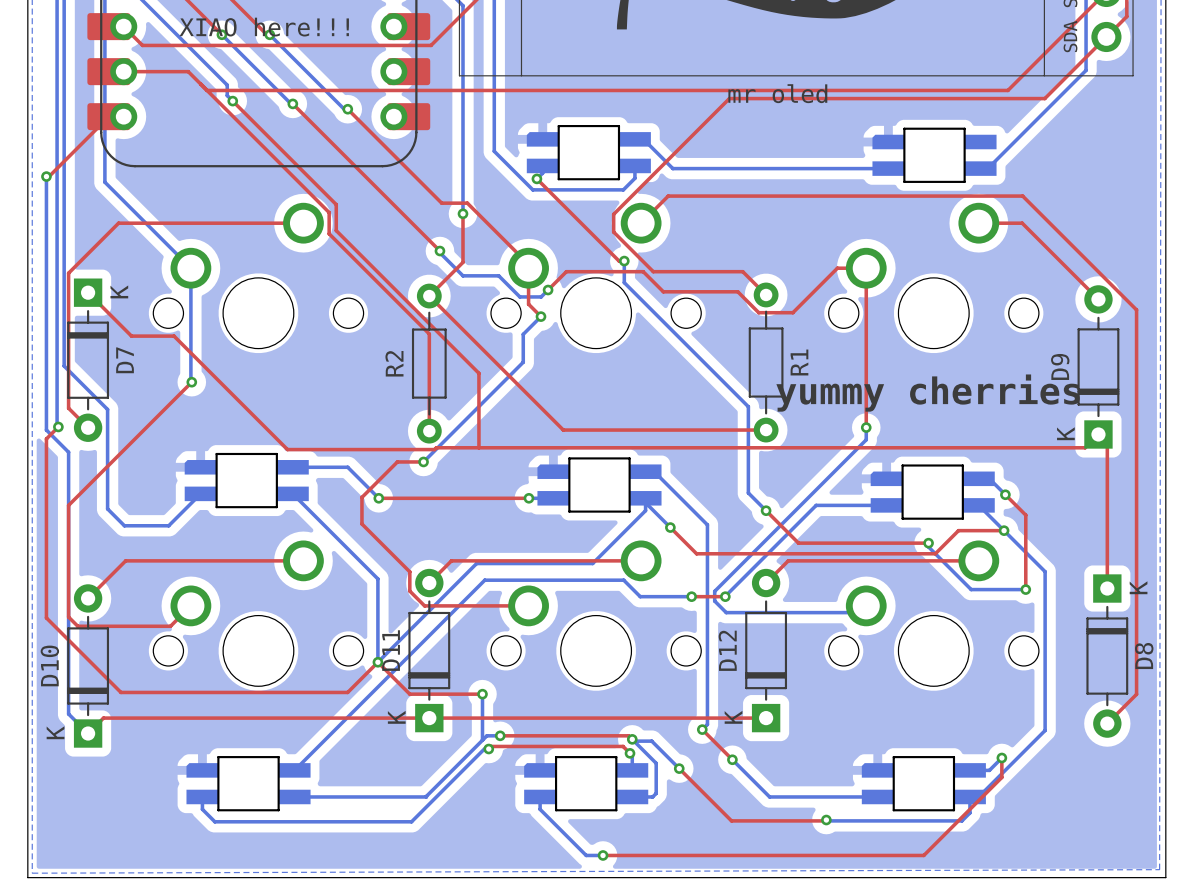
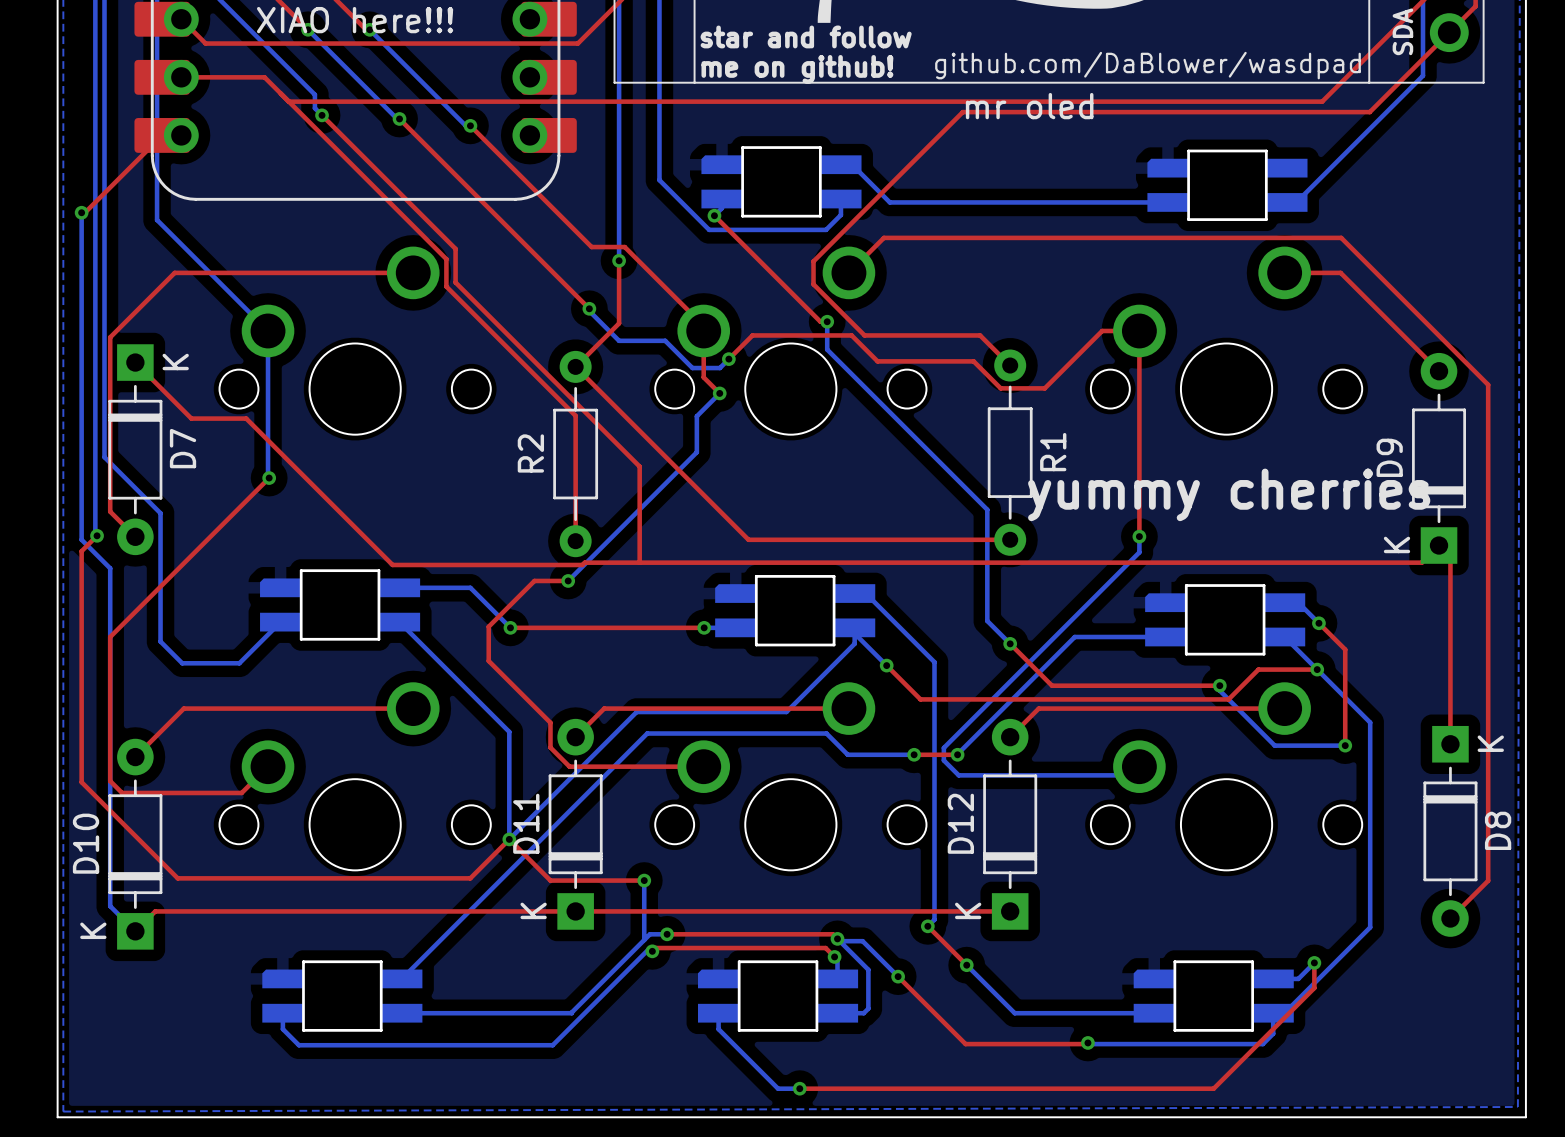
text: none -> star and follow (806, 36)
text: none -> github.com/DaBlower/wasdpad (1147, 65)
text: none -> me on github! (797, 69)

